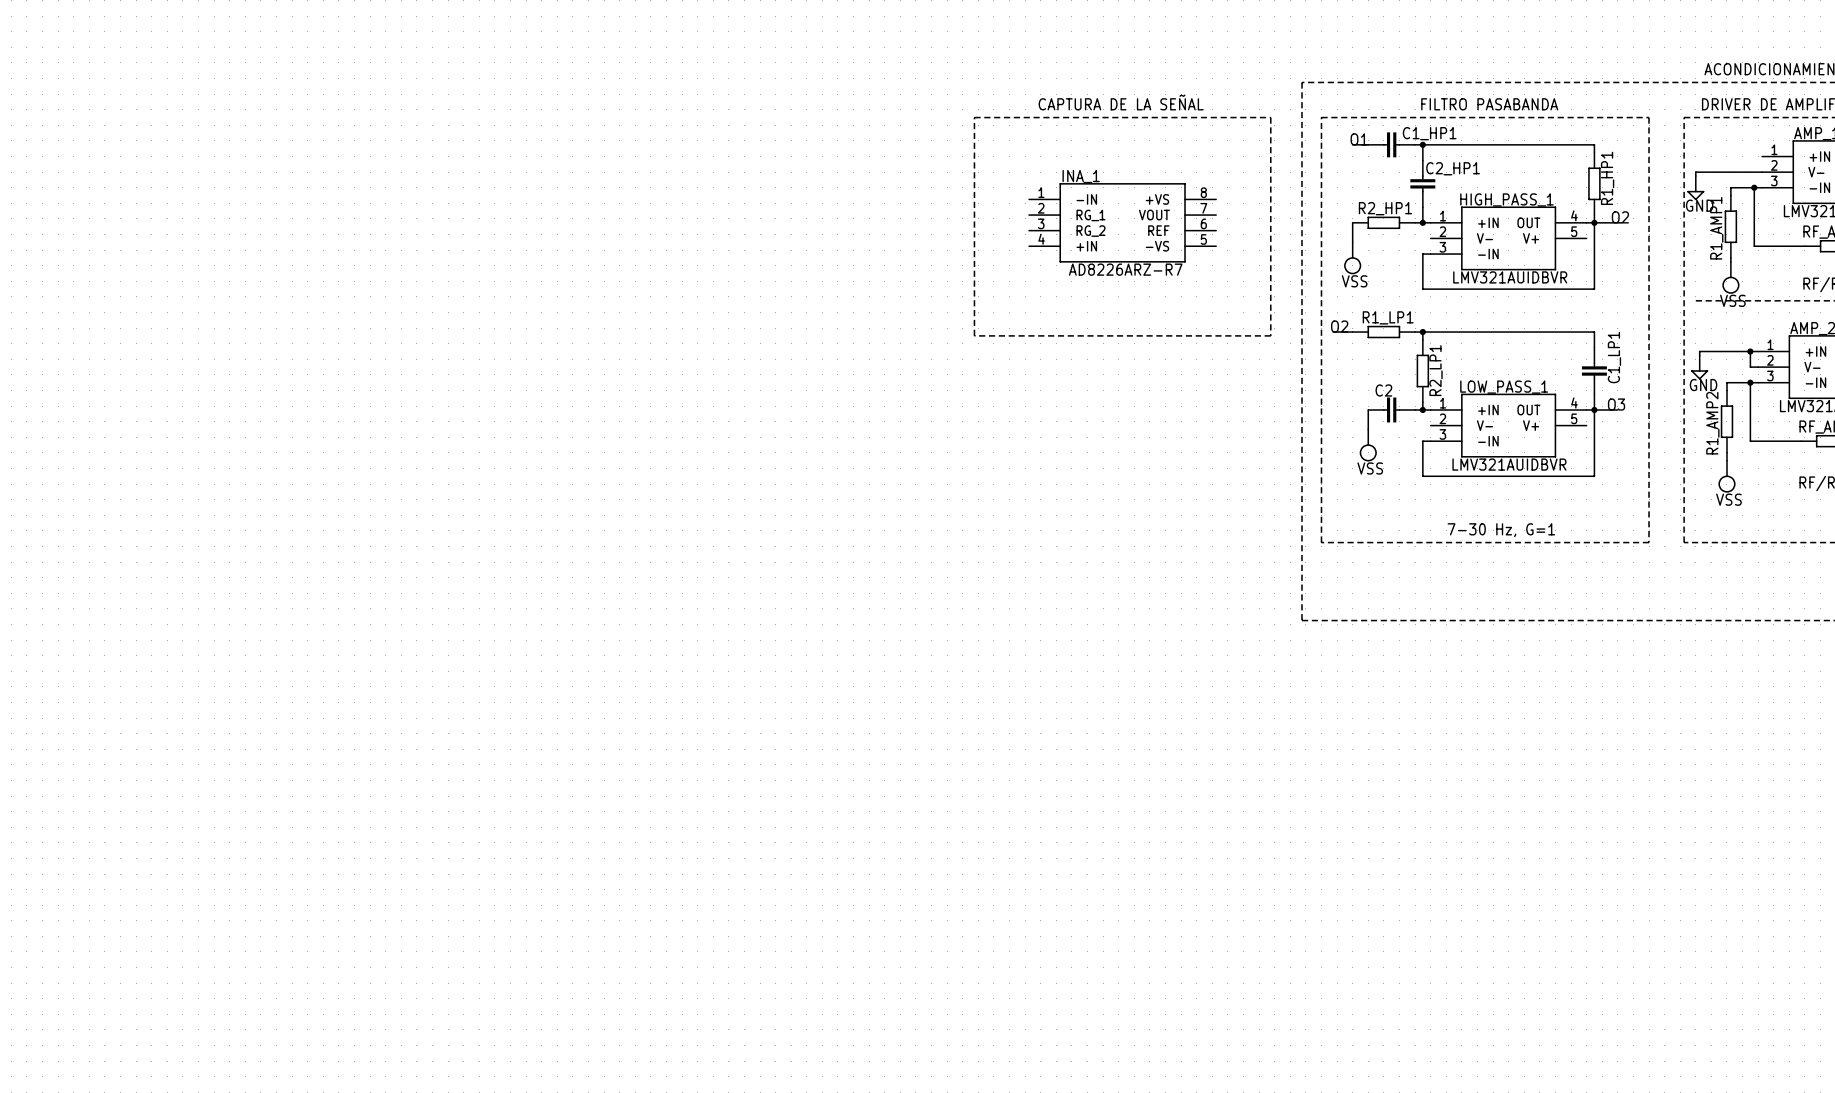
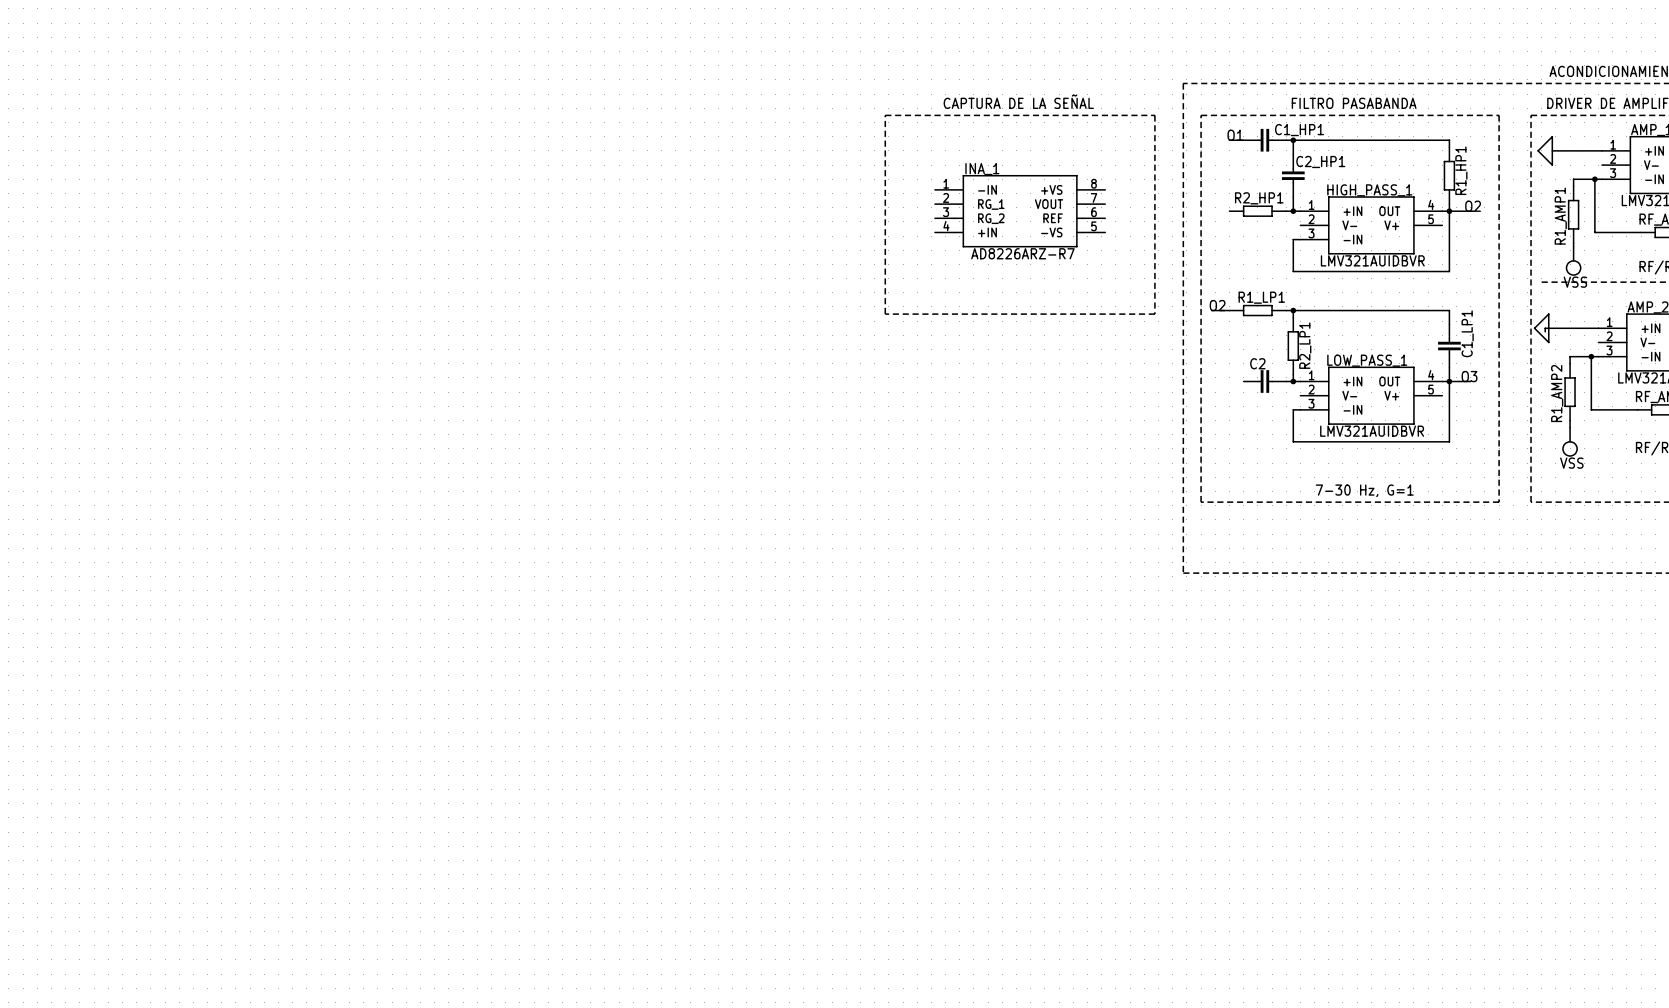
power symbol: none -> (1545, 150)
wire: none -> (1552, 150) (1601, 150)
wire: (1762, 172) (1695, 172) (1695, 176) -> none
power symbol: GND (1695, 188) -> none
wire: (1352, 222) (1352, 242) -> none
power symbol: VSS (1352, 258) -> none
power symbol: none -> (1541, 328)
wire: (1750, 351) (1750, 367) (1758, 367) -> none
junction: (1750, 351) -> none
power symbol: GND (1699, 367) -> none
wire: (1368, 410) (1368, 429) -> none
power symbol: VSS (1368, 445) -> none

